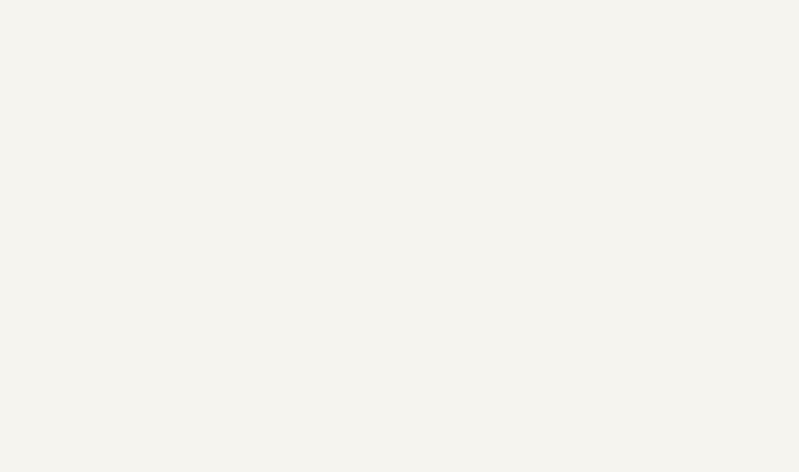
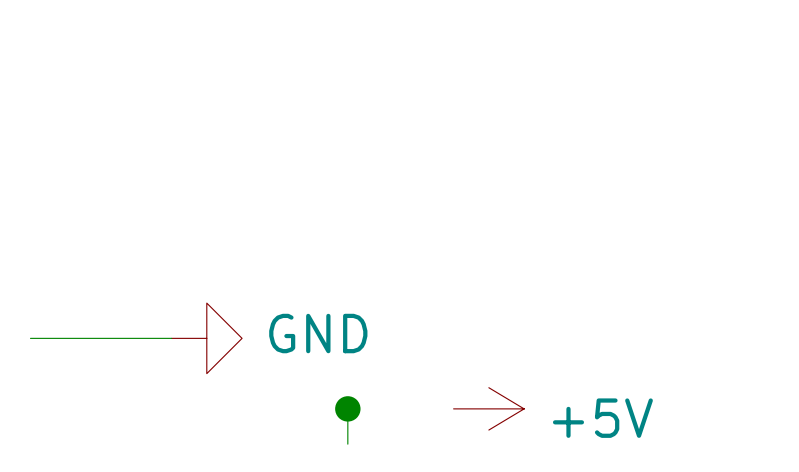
wire: none -> (30, 338) (171, 338)
power symbol: none -> GND (206, 338)
wire: none -> (347, 408) (347, 444)
junction: none -> (347, 408)
power symbol: none -> +5V (488, 408)

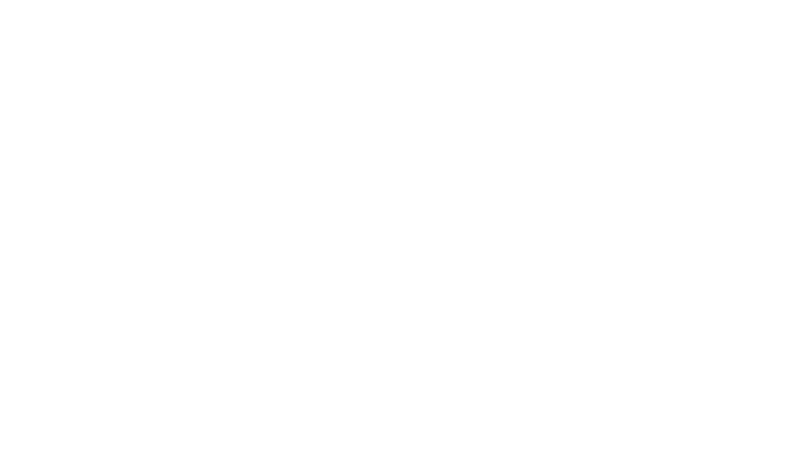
wire: (30, 338) (171, 338) -> none
power symbol: GND (206, 338) -> none
wire: (347, 408) (347, 444) -> none
junction: (347, 408) -> none
power symbol: +5V (488, 408) -> none

